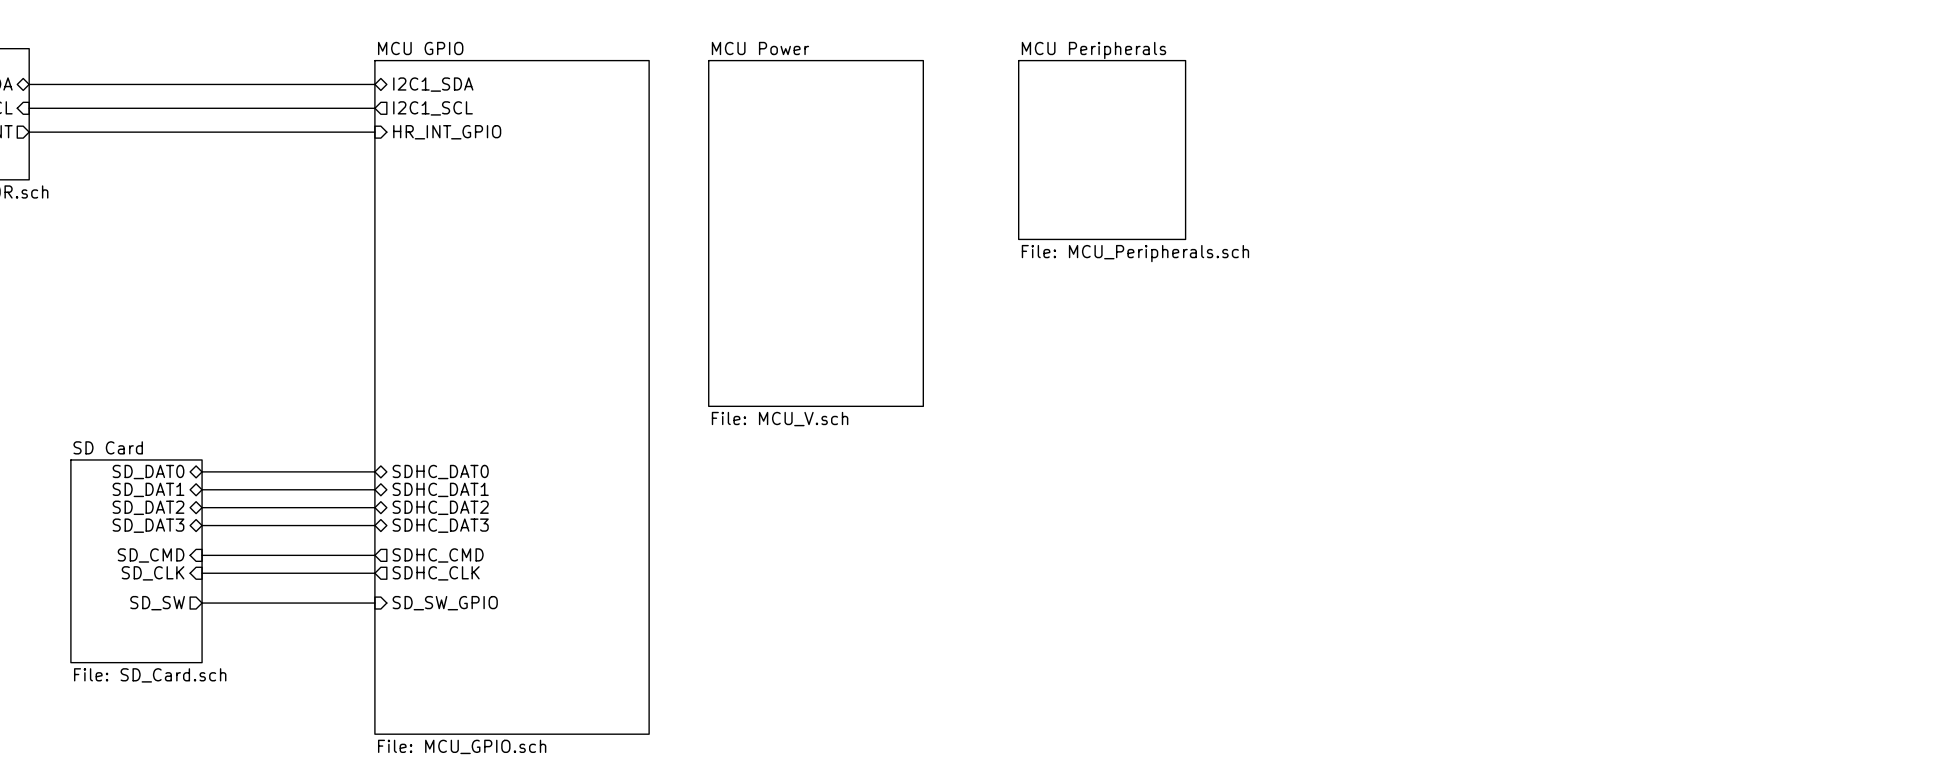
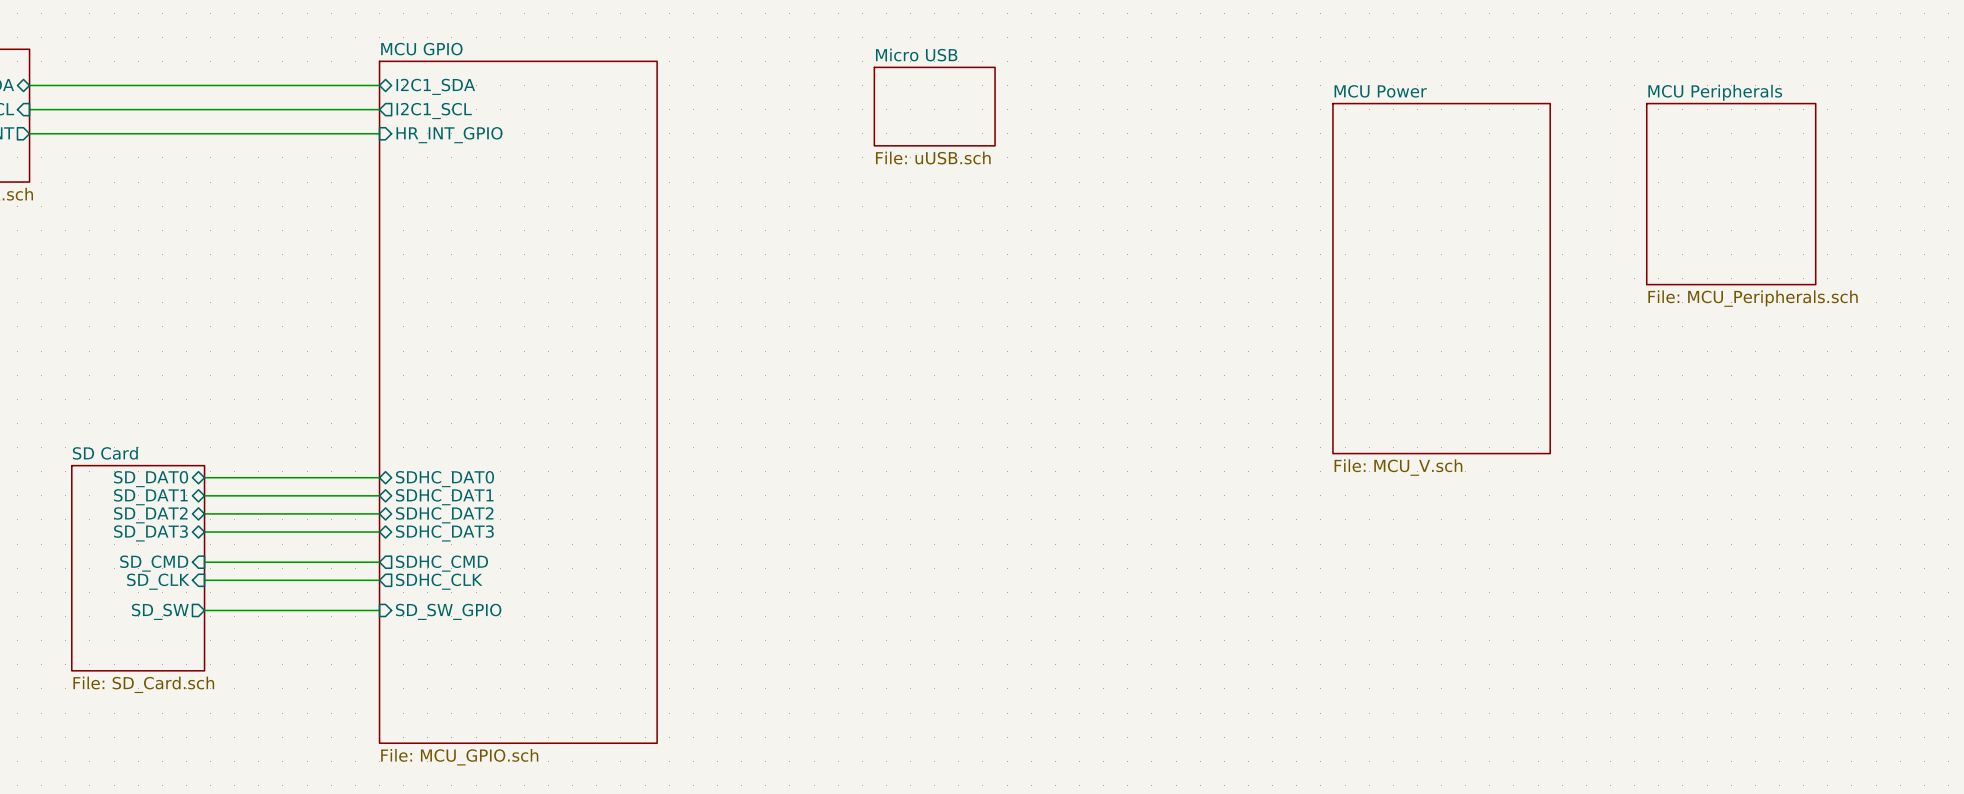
sheet Micro USB: none -> File: uUSB.sch (934, 106)
sheet MCU Peripherals: File: MCU_Peripherals.sch (1102, 150) -> none
sheet MCU Peripherals: none -> File: MCU_Peripherals.sch (1731, 194)
sheet MCU Power: File: MCU_V.sch (816, 233) -> none
sheet MCU Power: none -> File: MCU_V.sch (1441, 278)

